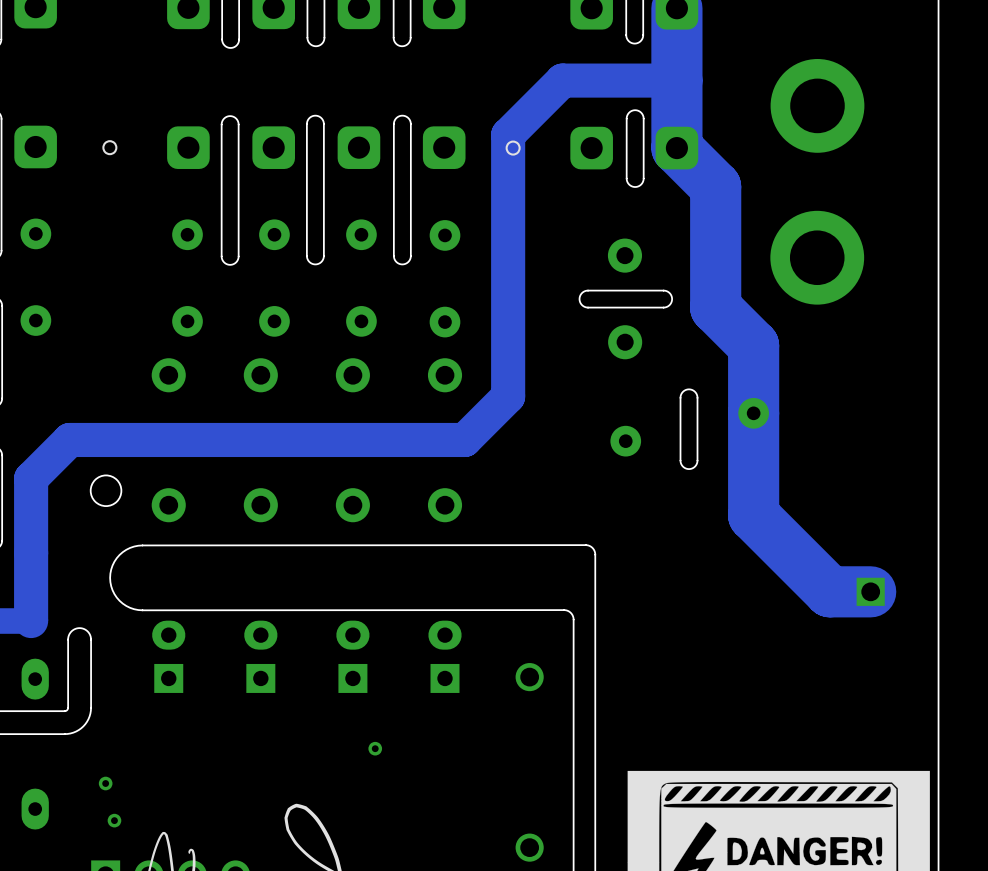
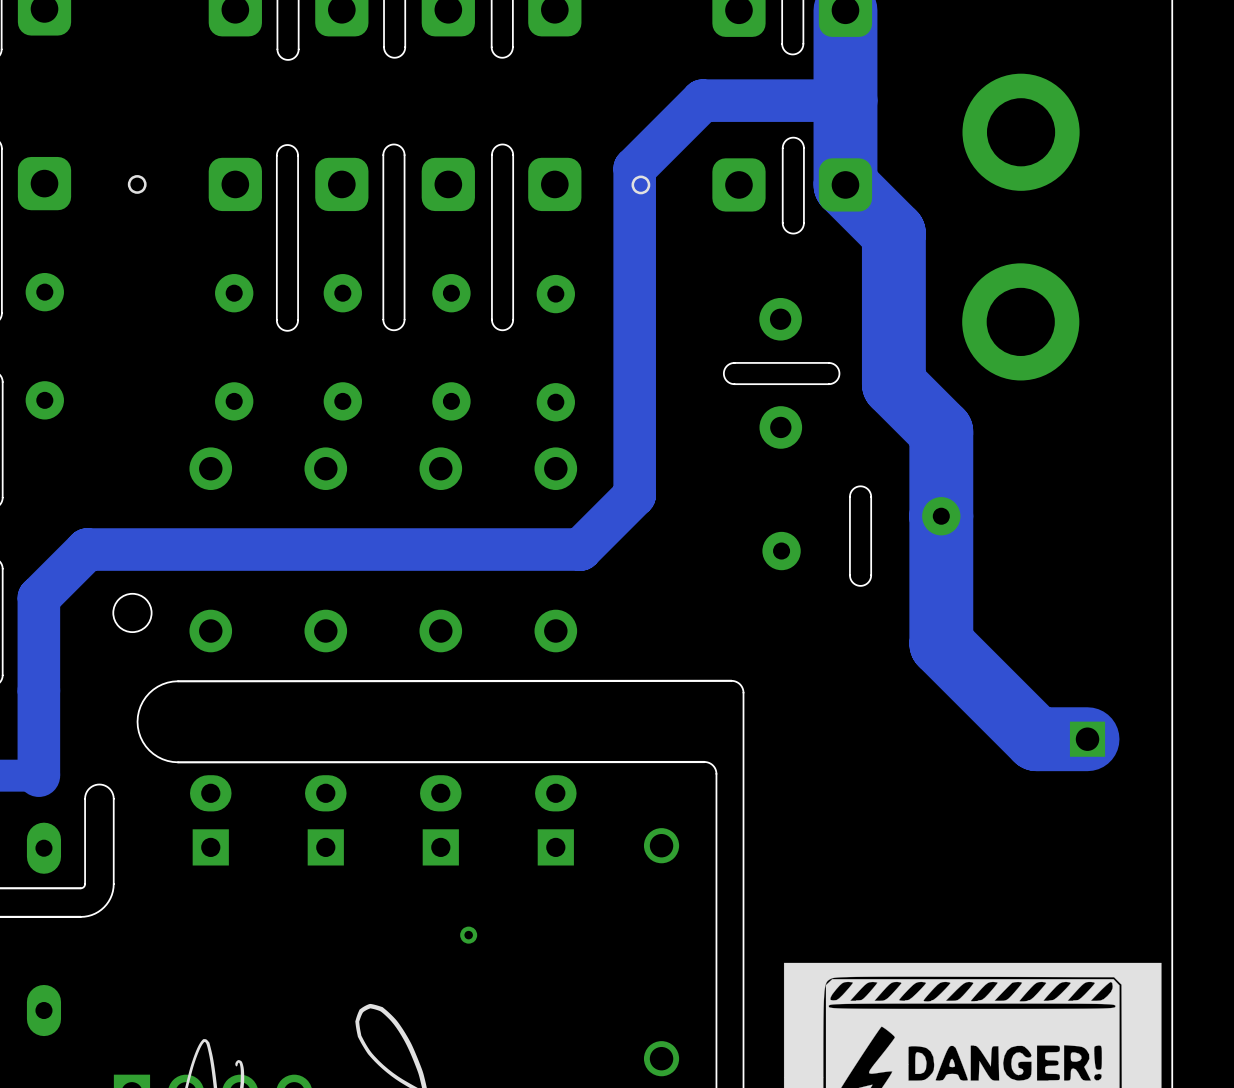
via: (105, 783) -> none
via: (114, 820) -> none

